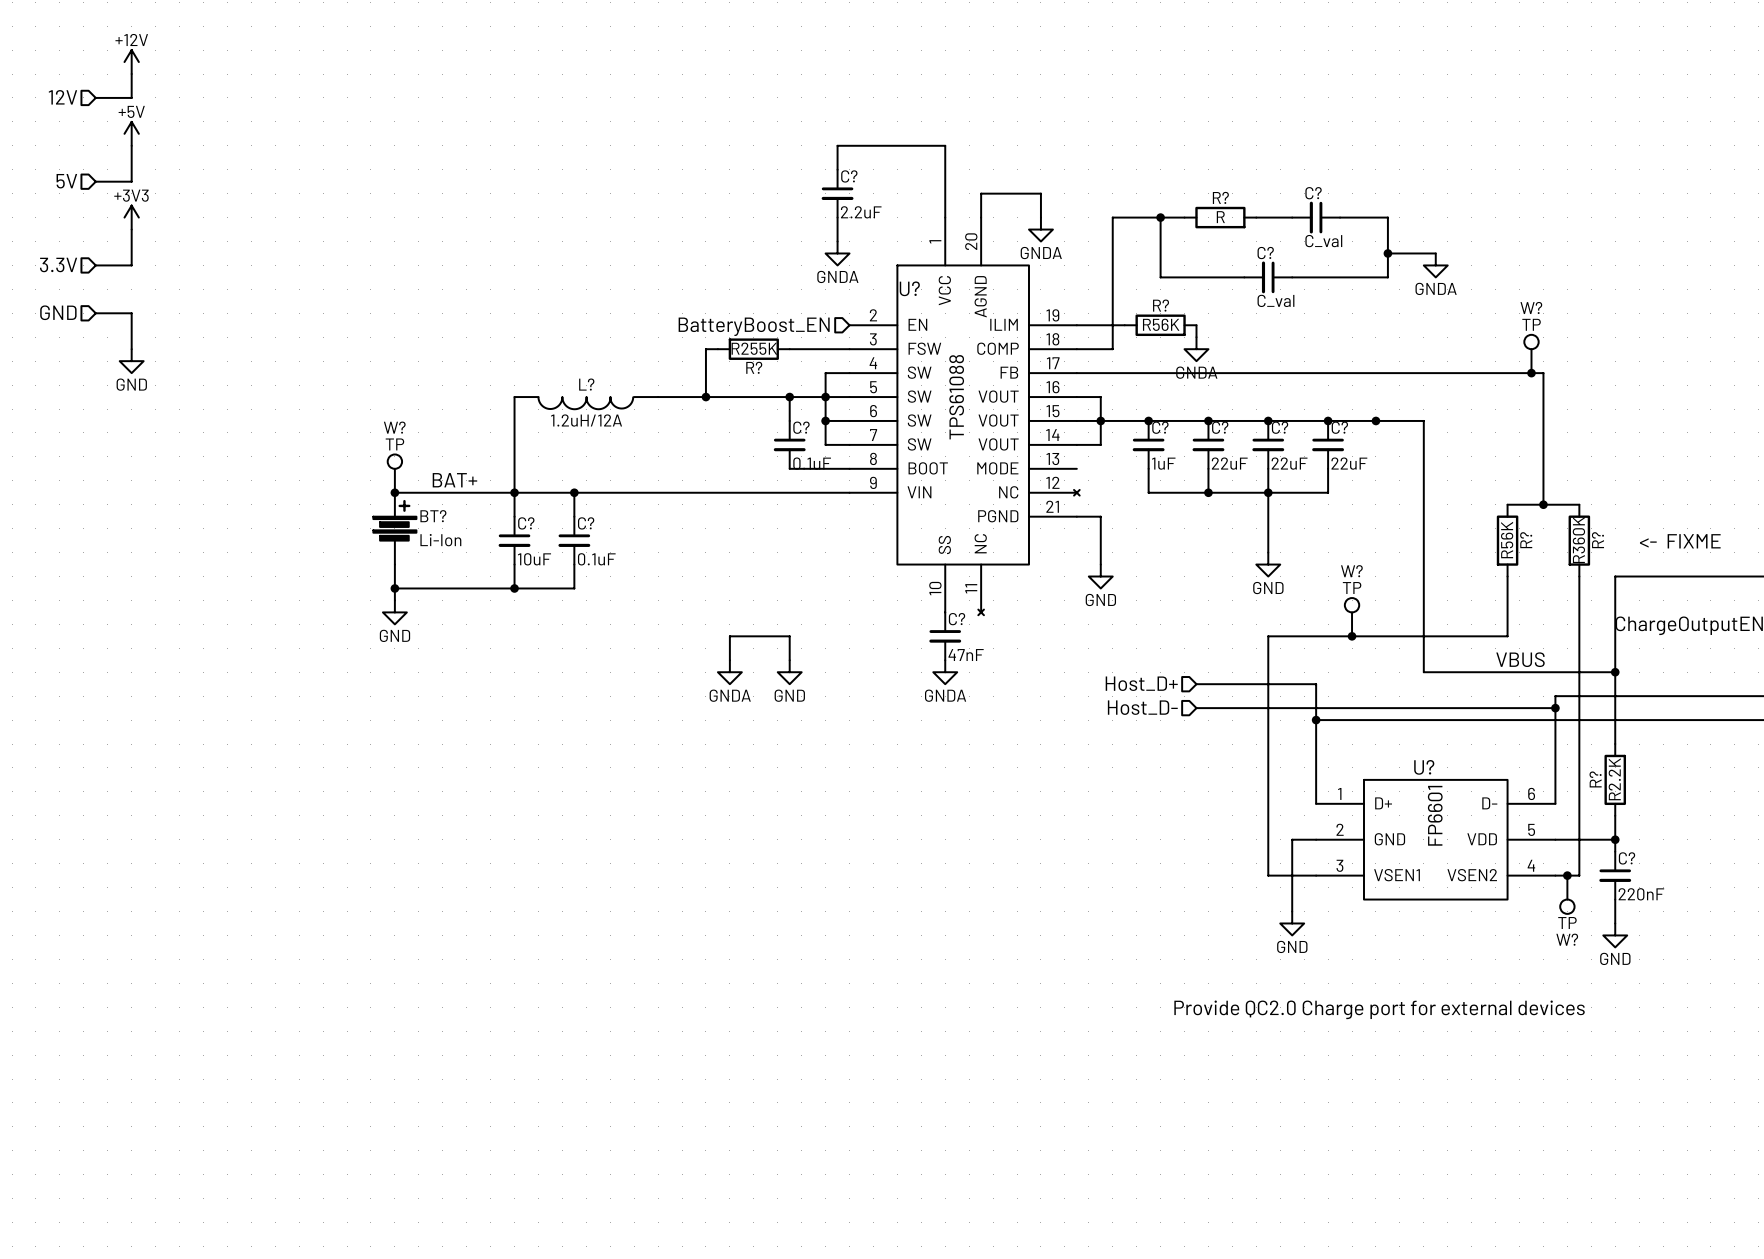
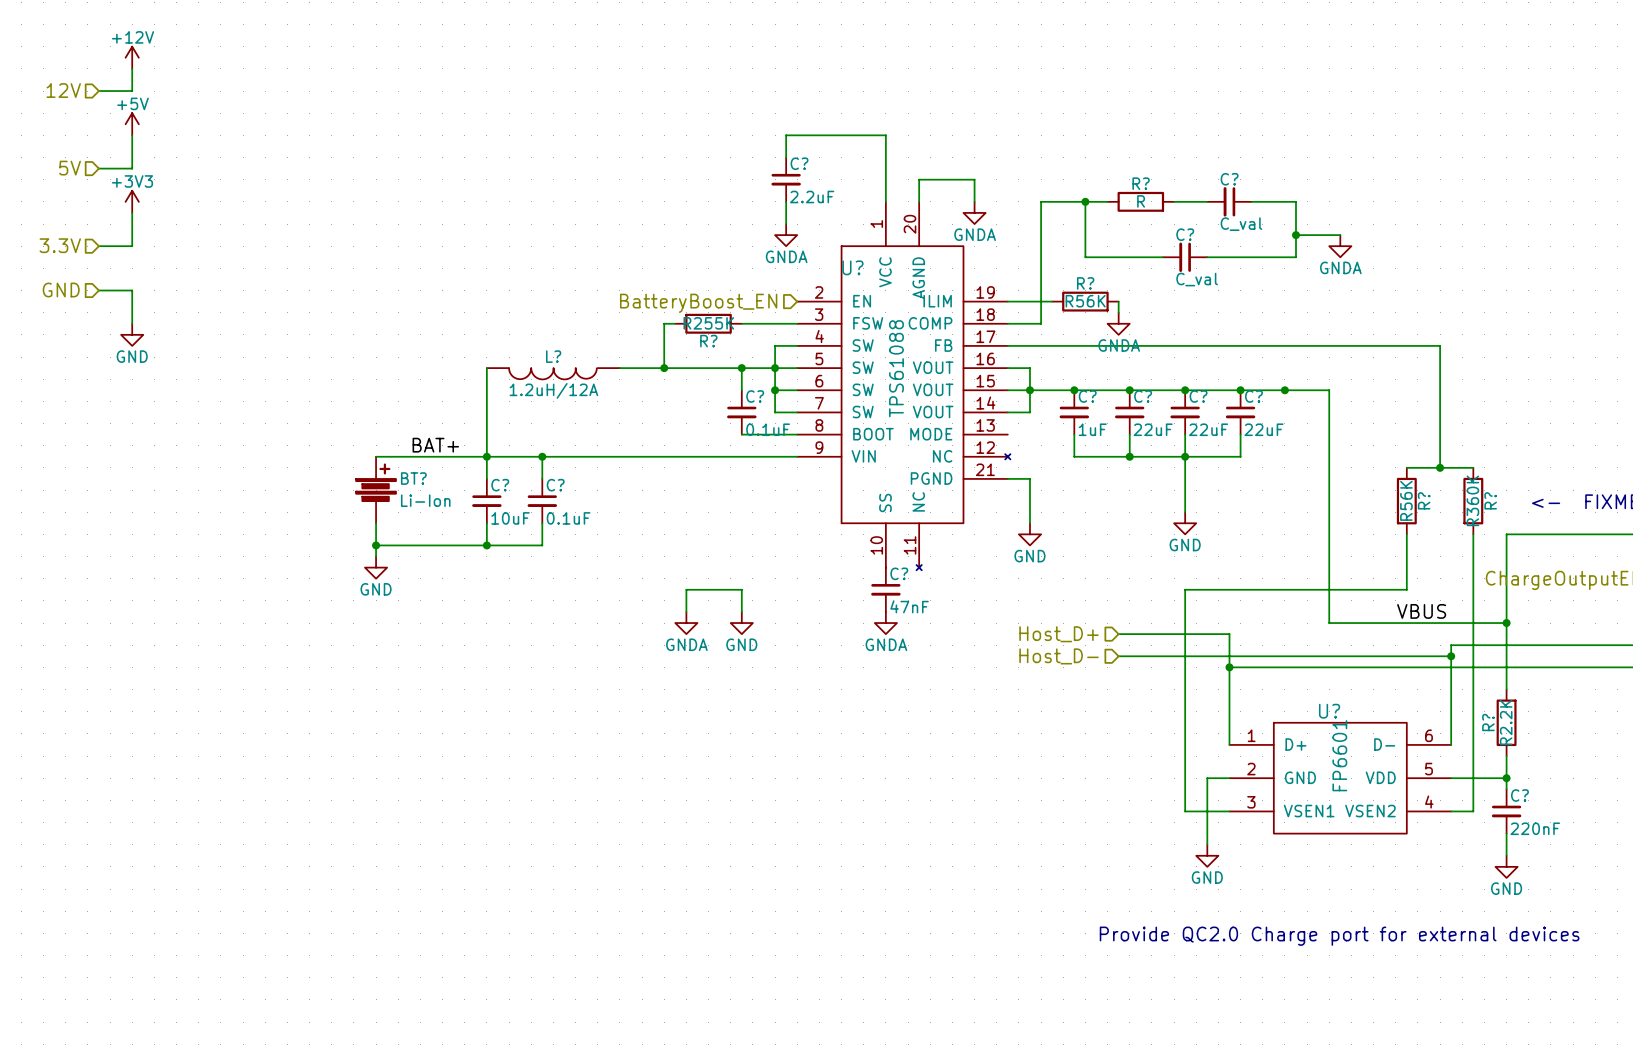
W?: TP (1531, 353) -> none
junction: (1531, 373) -> none
W?: TP (394, 473) -> none
junction: (394, 492) -> none
W?: TP (1352, 617) -> none
junction: (1352, 636) -> none
junction: (1567, 875) -> none
W?: TP (1567, 894) -> none

